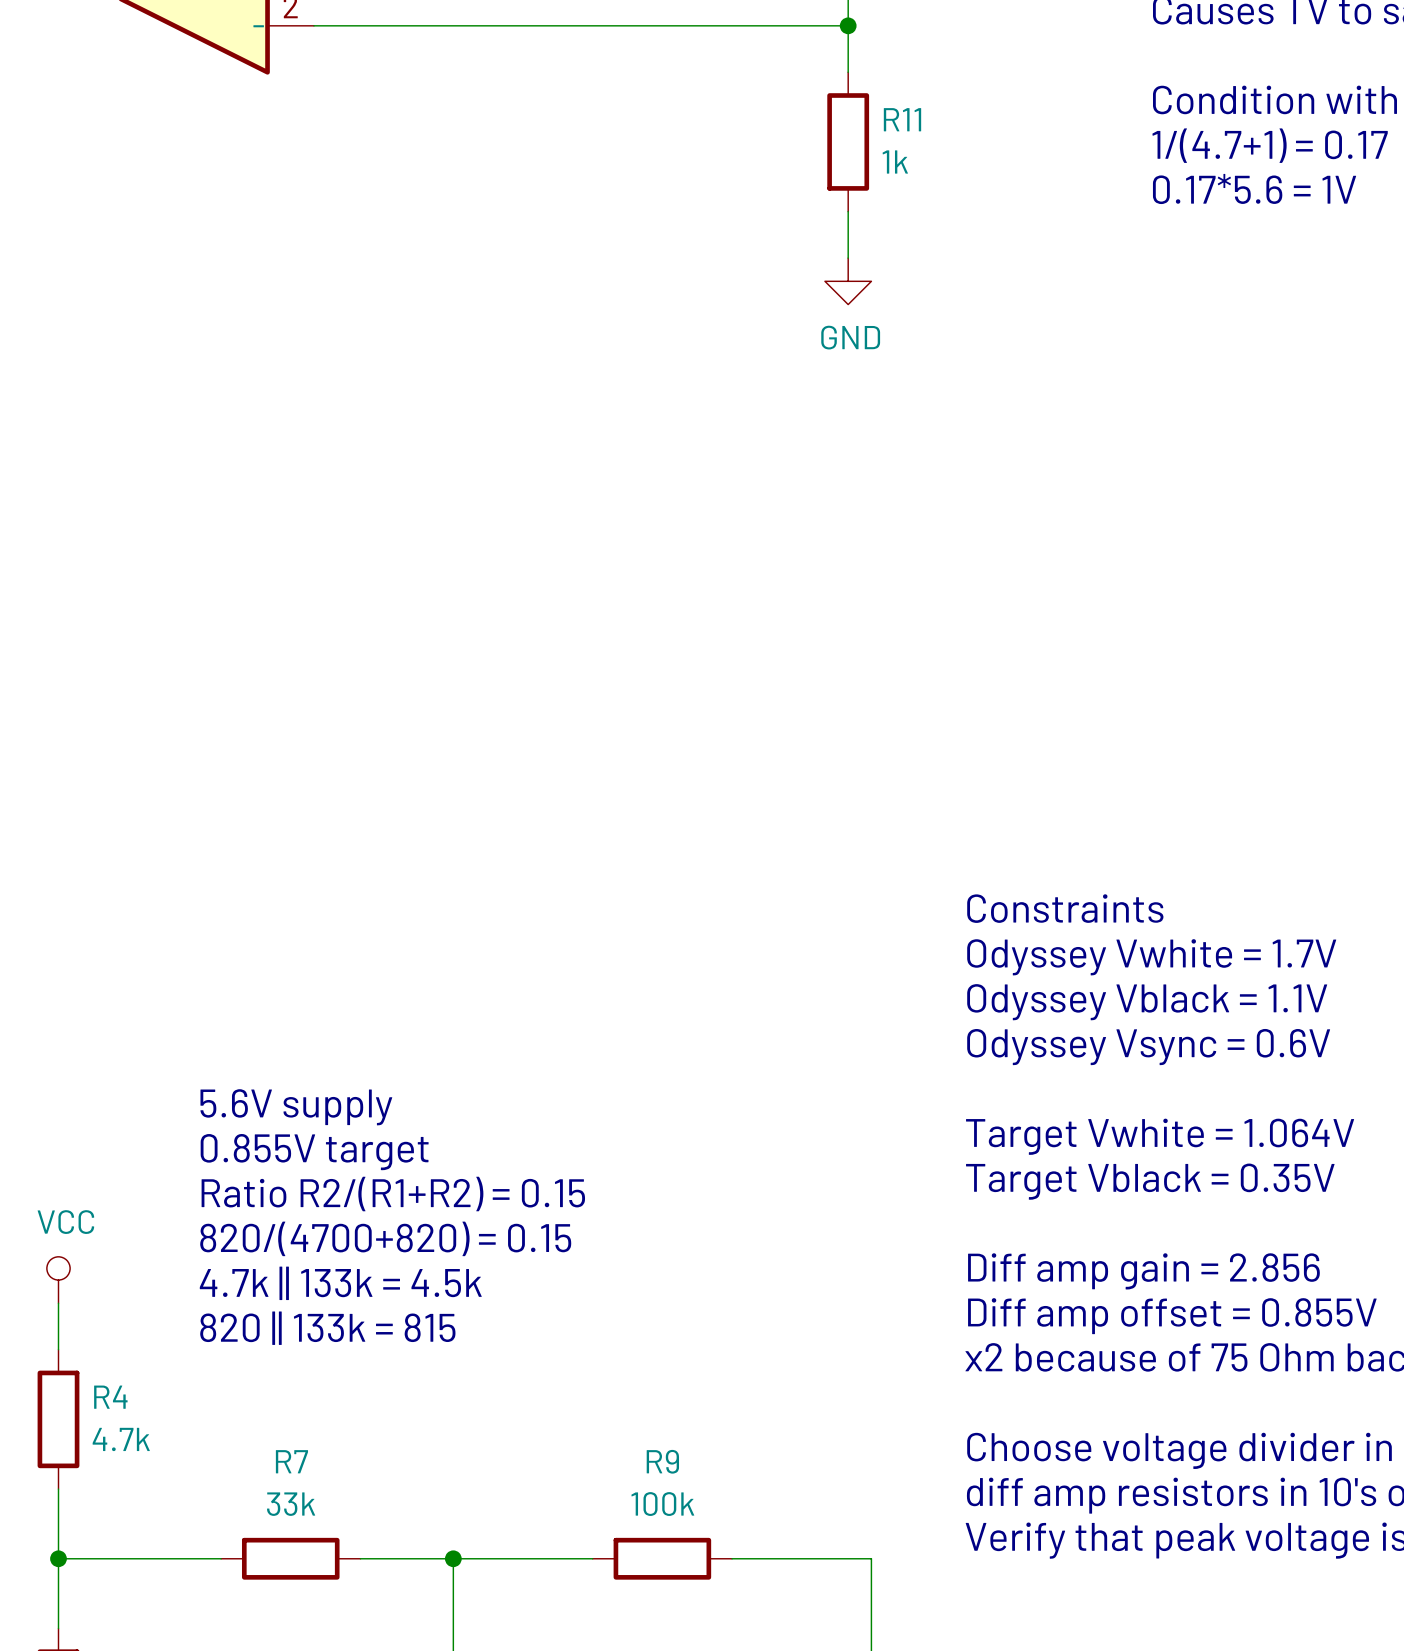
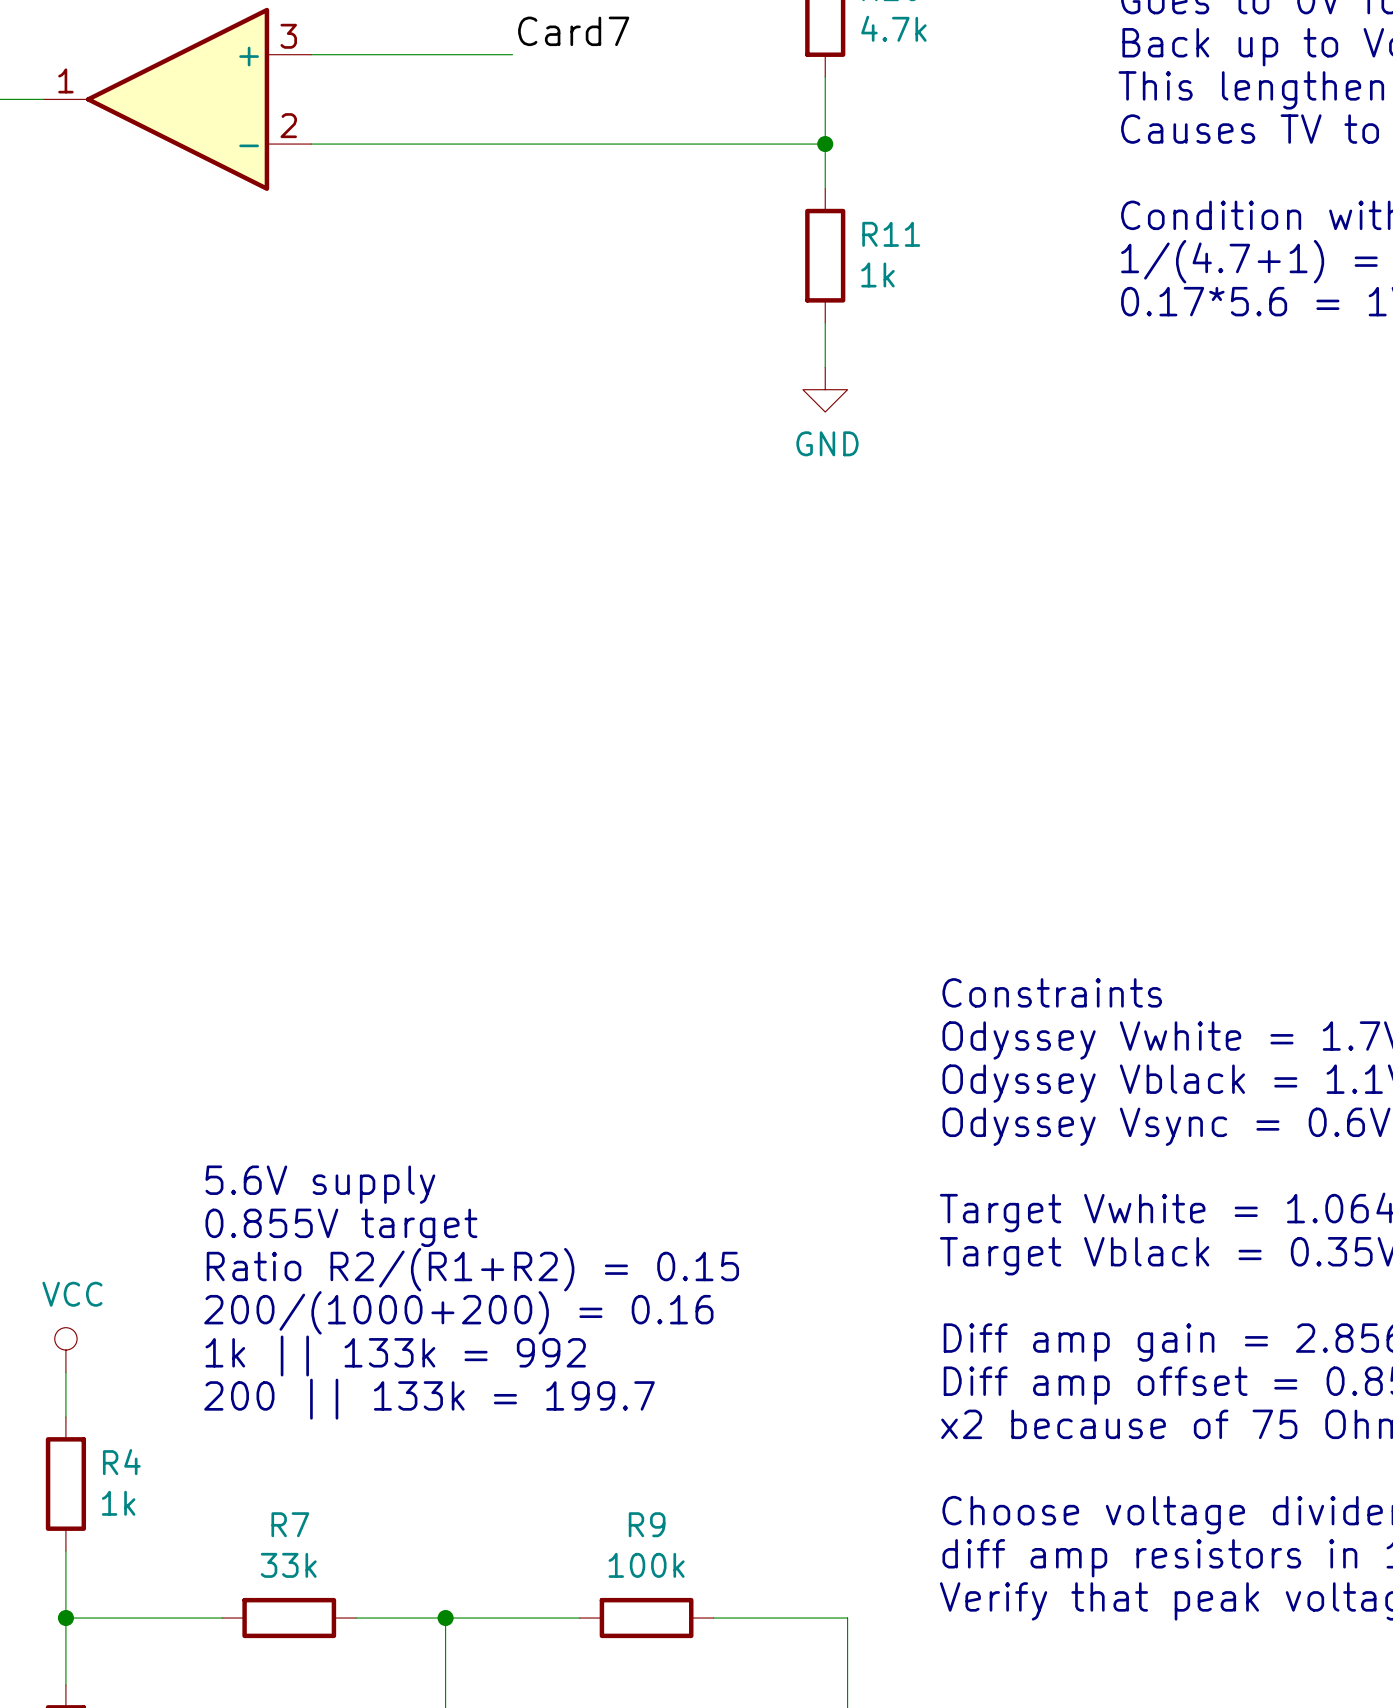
text: 820/(4700+820) = 0.15 (385, 1238) -> 200/(1000+200) = 0.16 (458, 1312)
text: 4.7k || 133k = 4.5k (340, 1283) -> 1k || 133k = 992 (395, 1355)
text: 820 || 133k = 815 (327, 1328) -> 200 || 133k = 199.7 (429, 1399)
R4 value: 4.7k (121, 1439) -> 1k (118, 1503)

